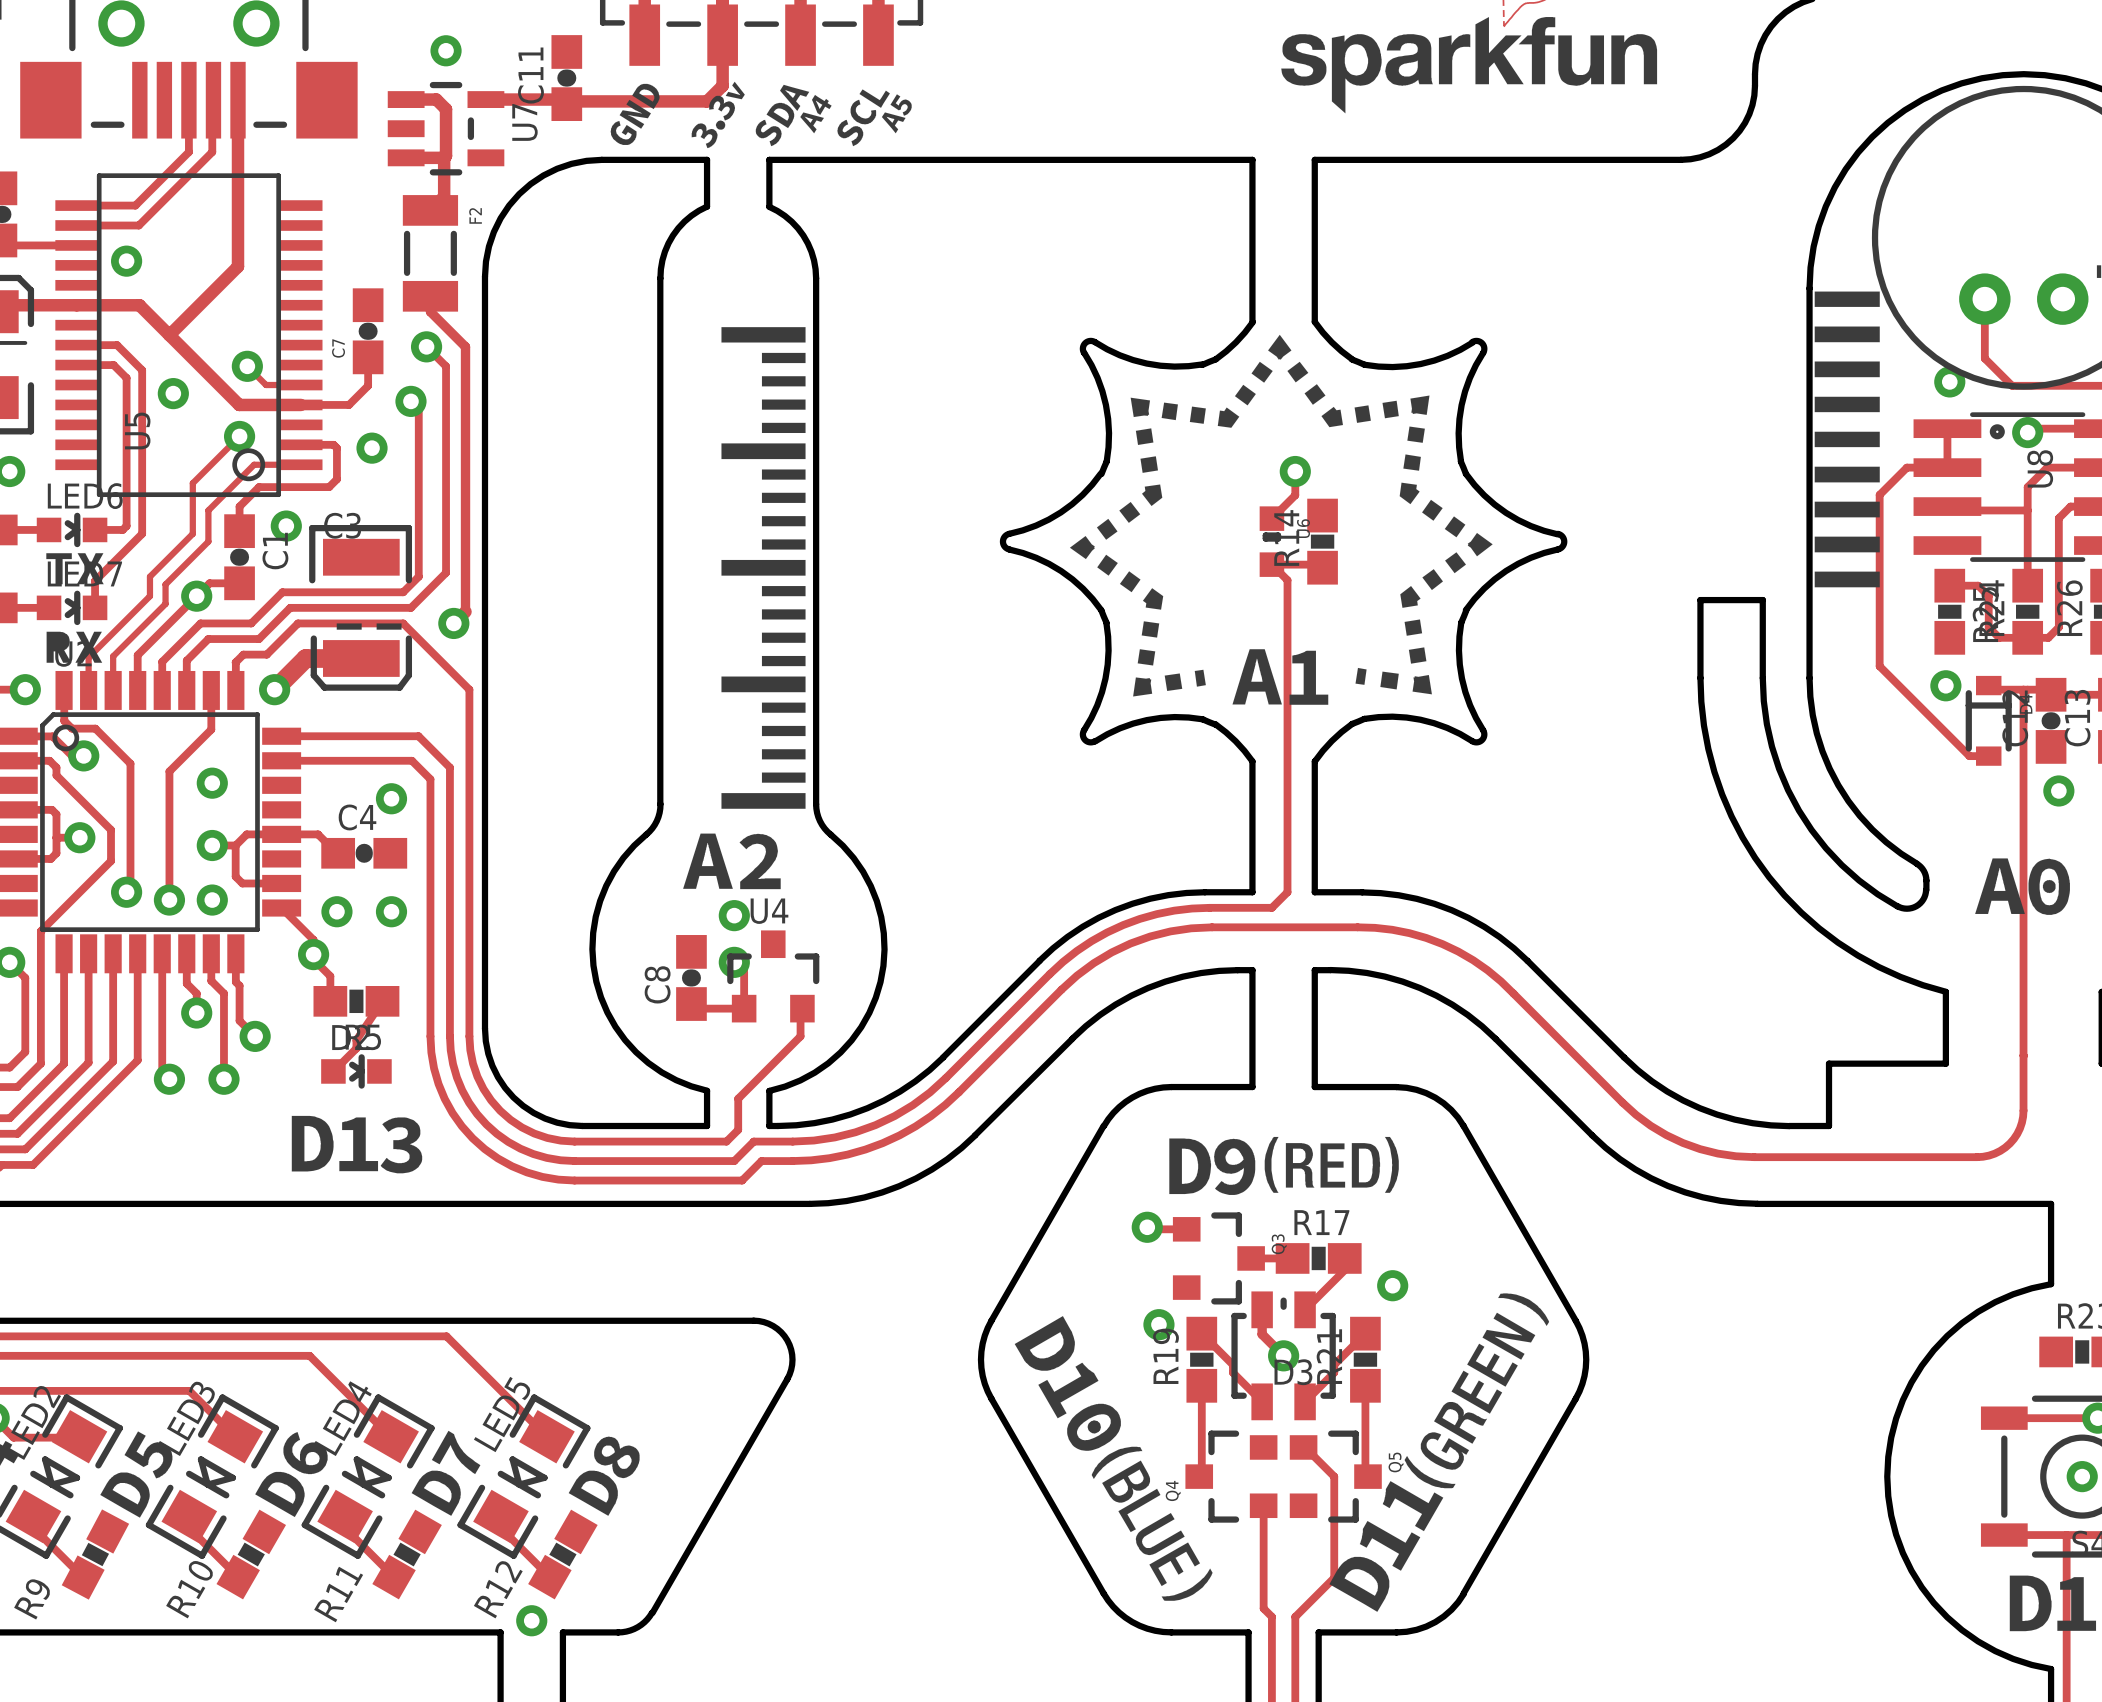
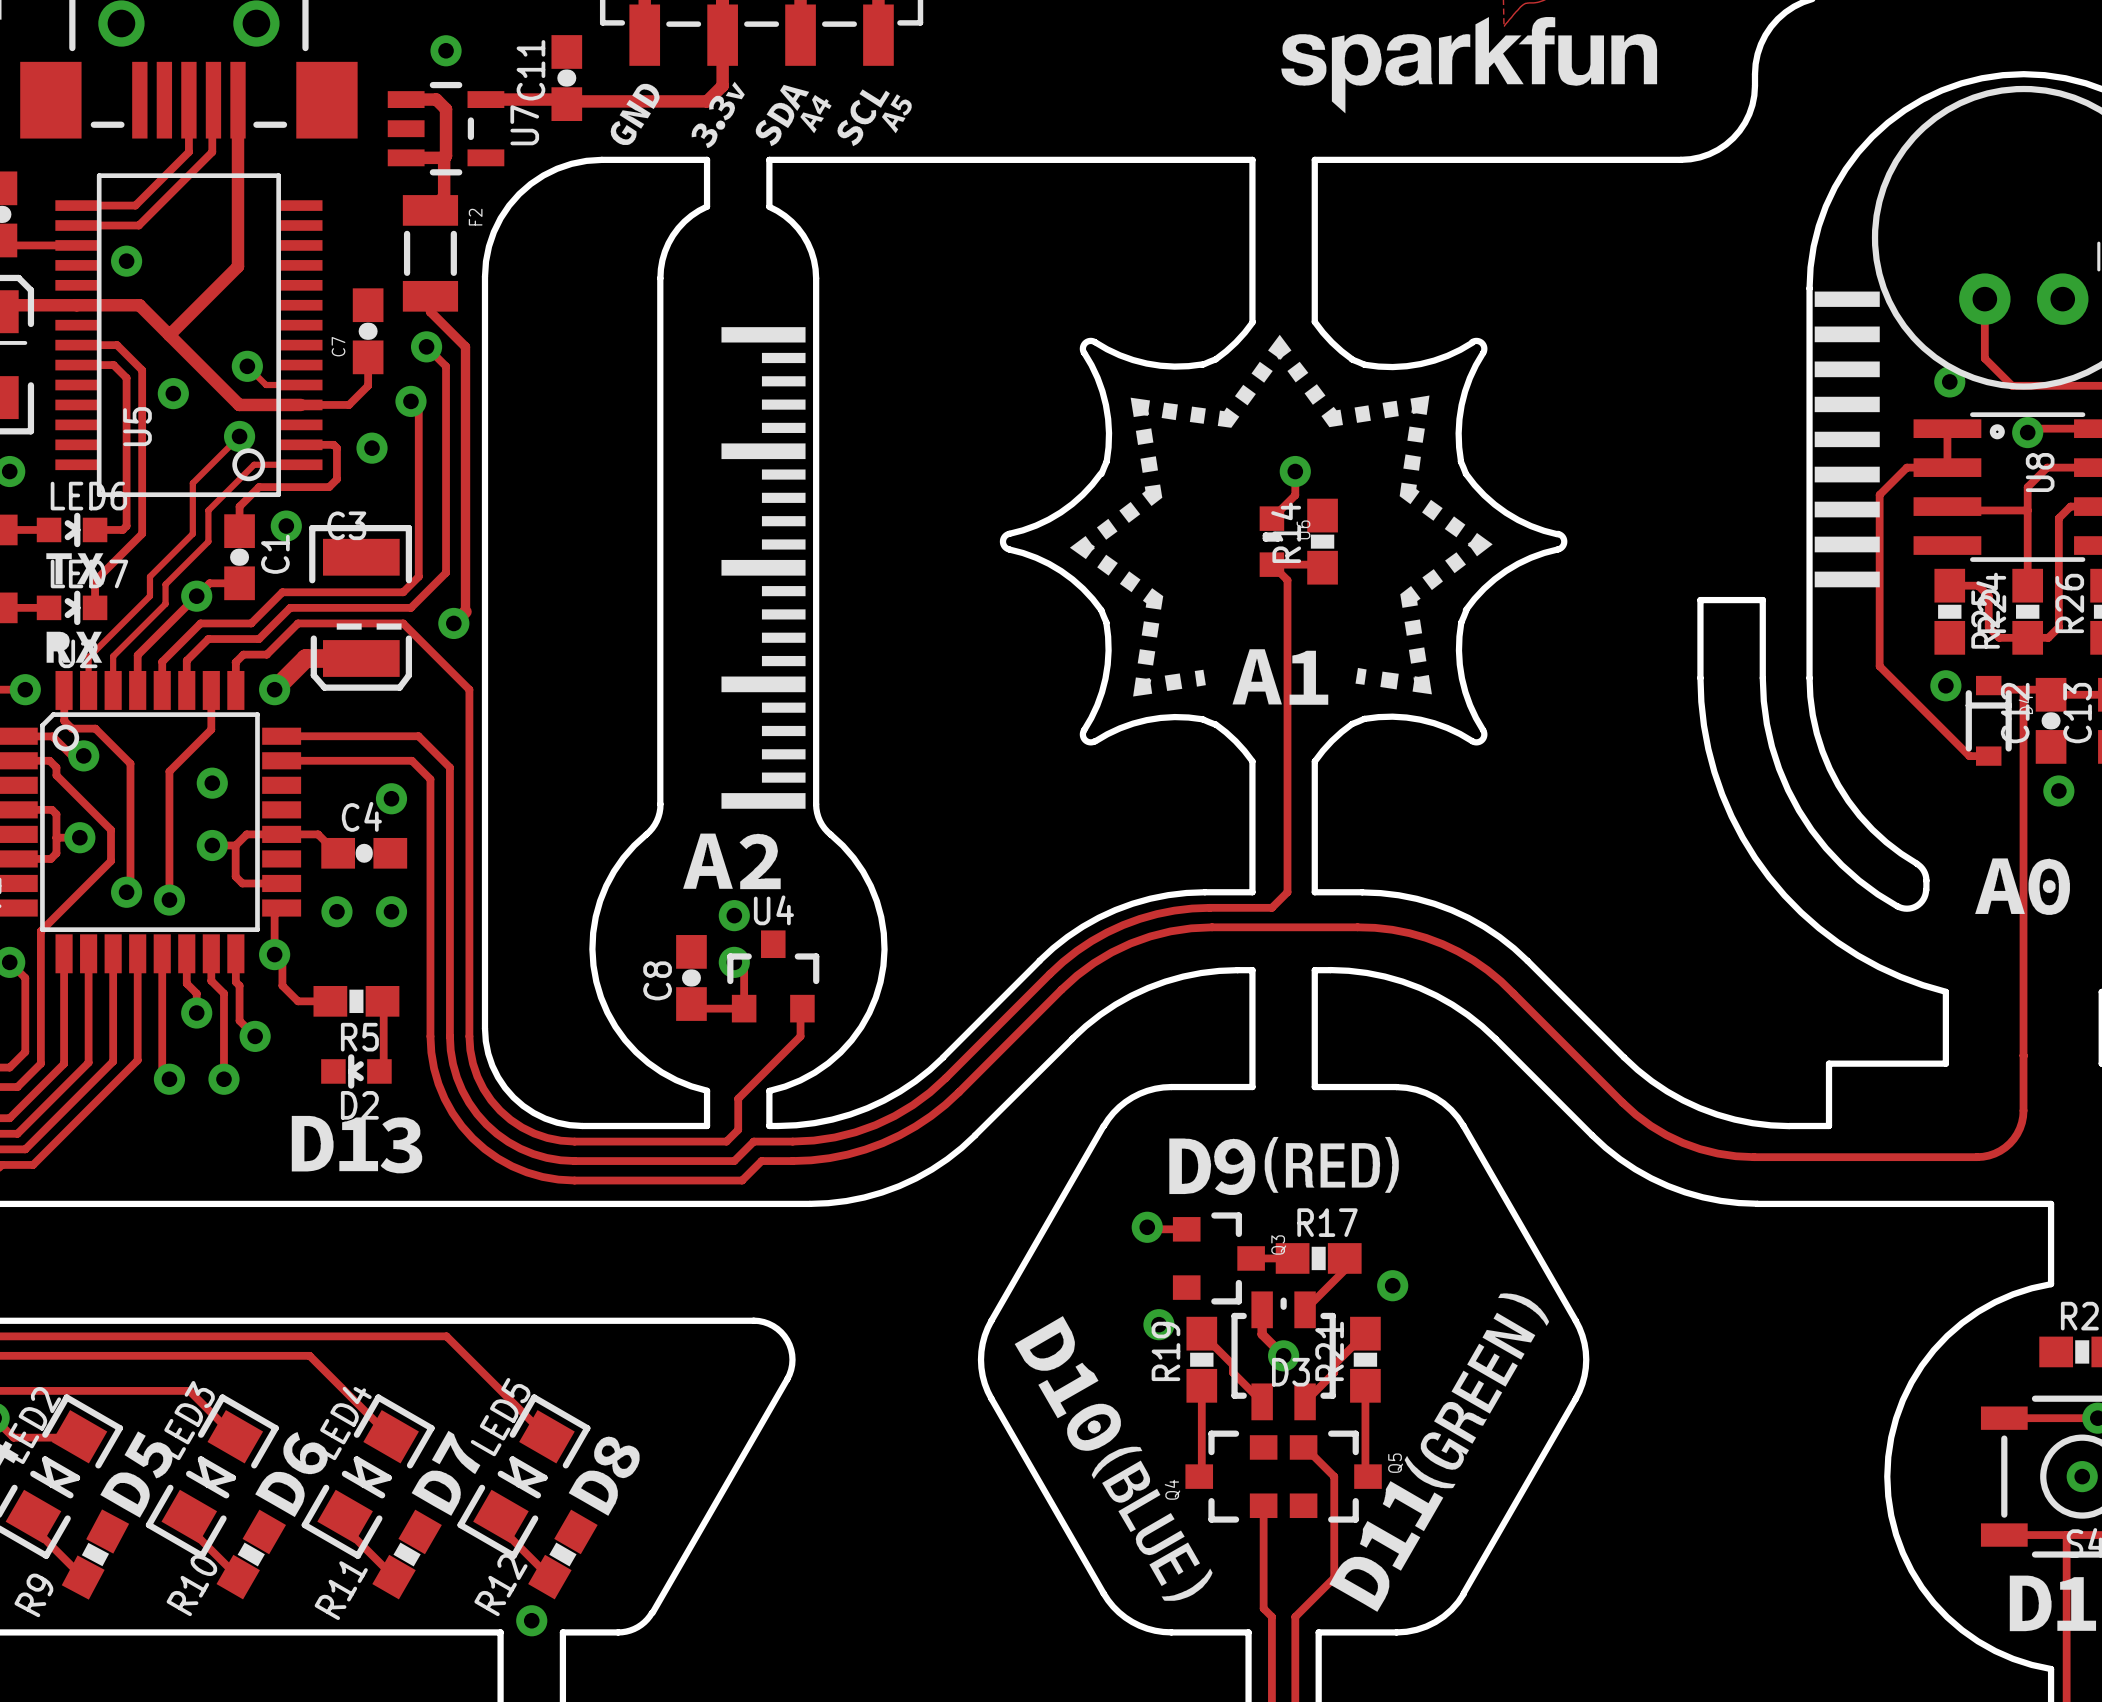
via: (212, 900) -> none
track: (281, 908) (313, 939) (313, 959) (330, 976) (330, 1001) -> (281, 908) (274, 915) (274, 954) (282, 962) (282, 985) (298, 1001) (329, 1001)
via position: (313, 954) -> (274, 954)
track: (382, 1001) (356, 1040) (356, 1048) (333, 1071) -> (382, 1001) (383, 1071) (379, 1071)
D2 rotation: 0° (356, 1071) -> 180° (356, 1071)

